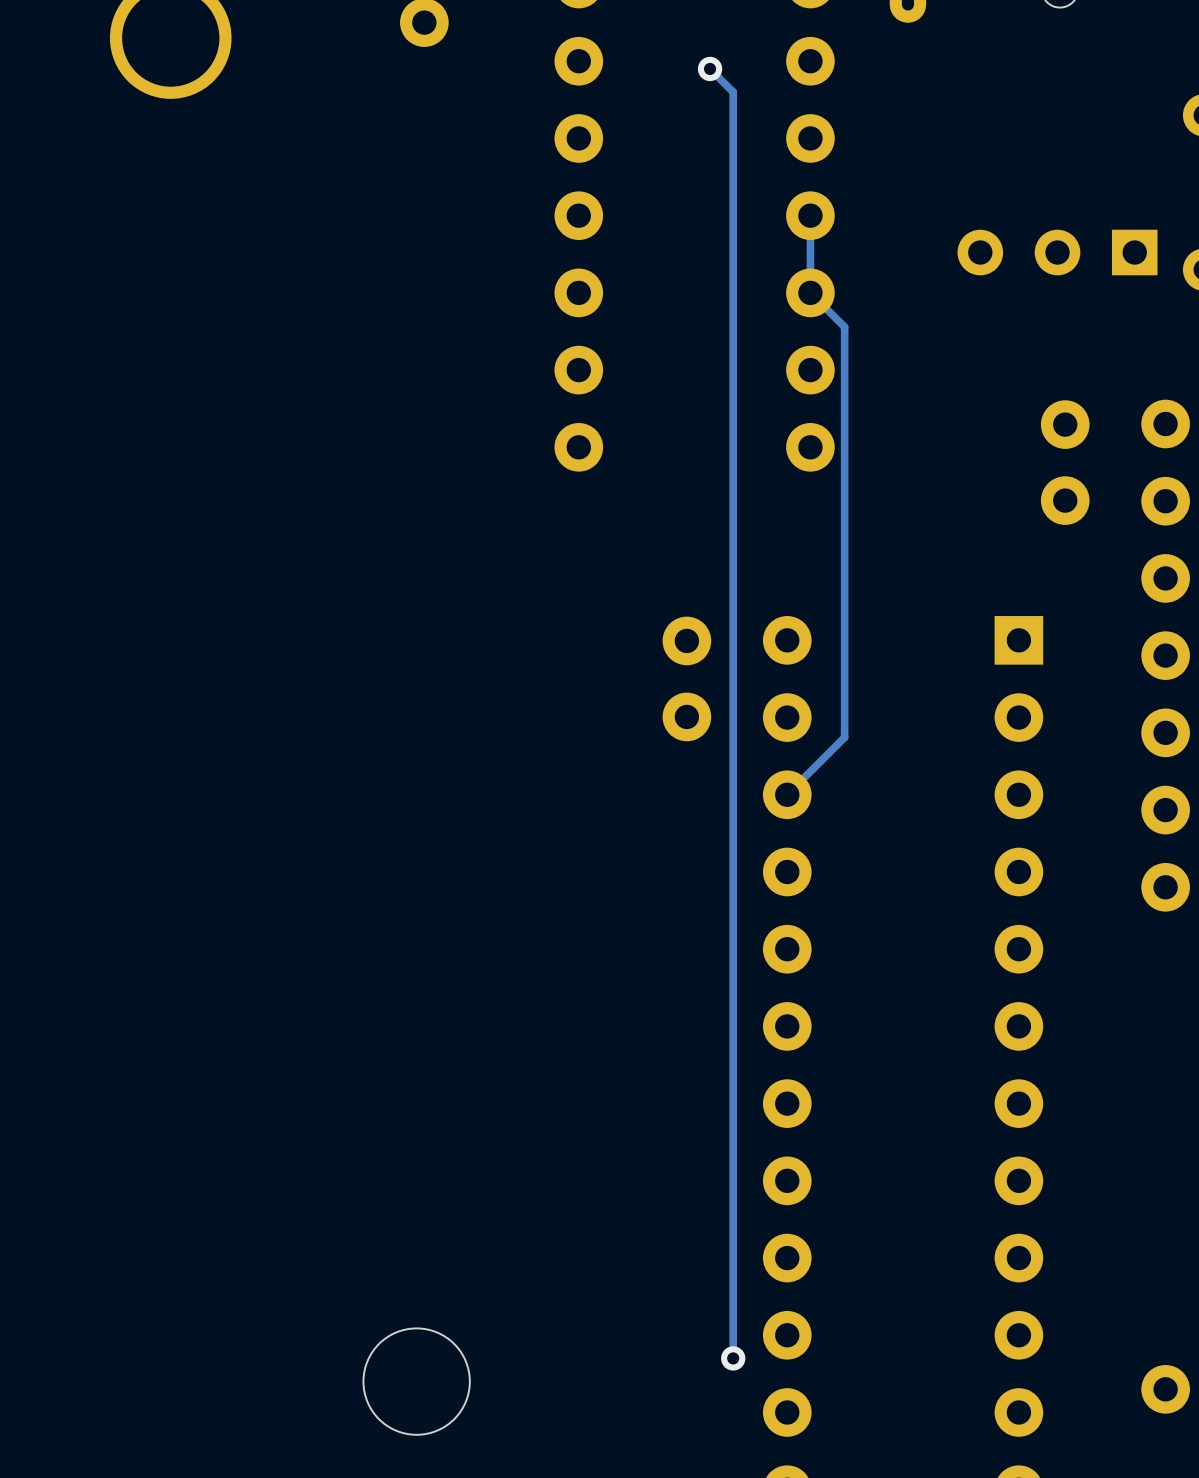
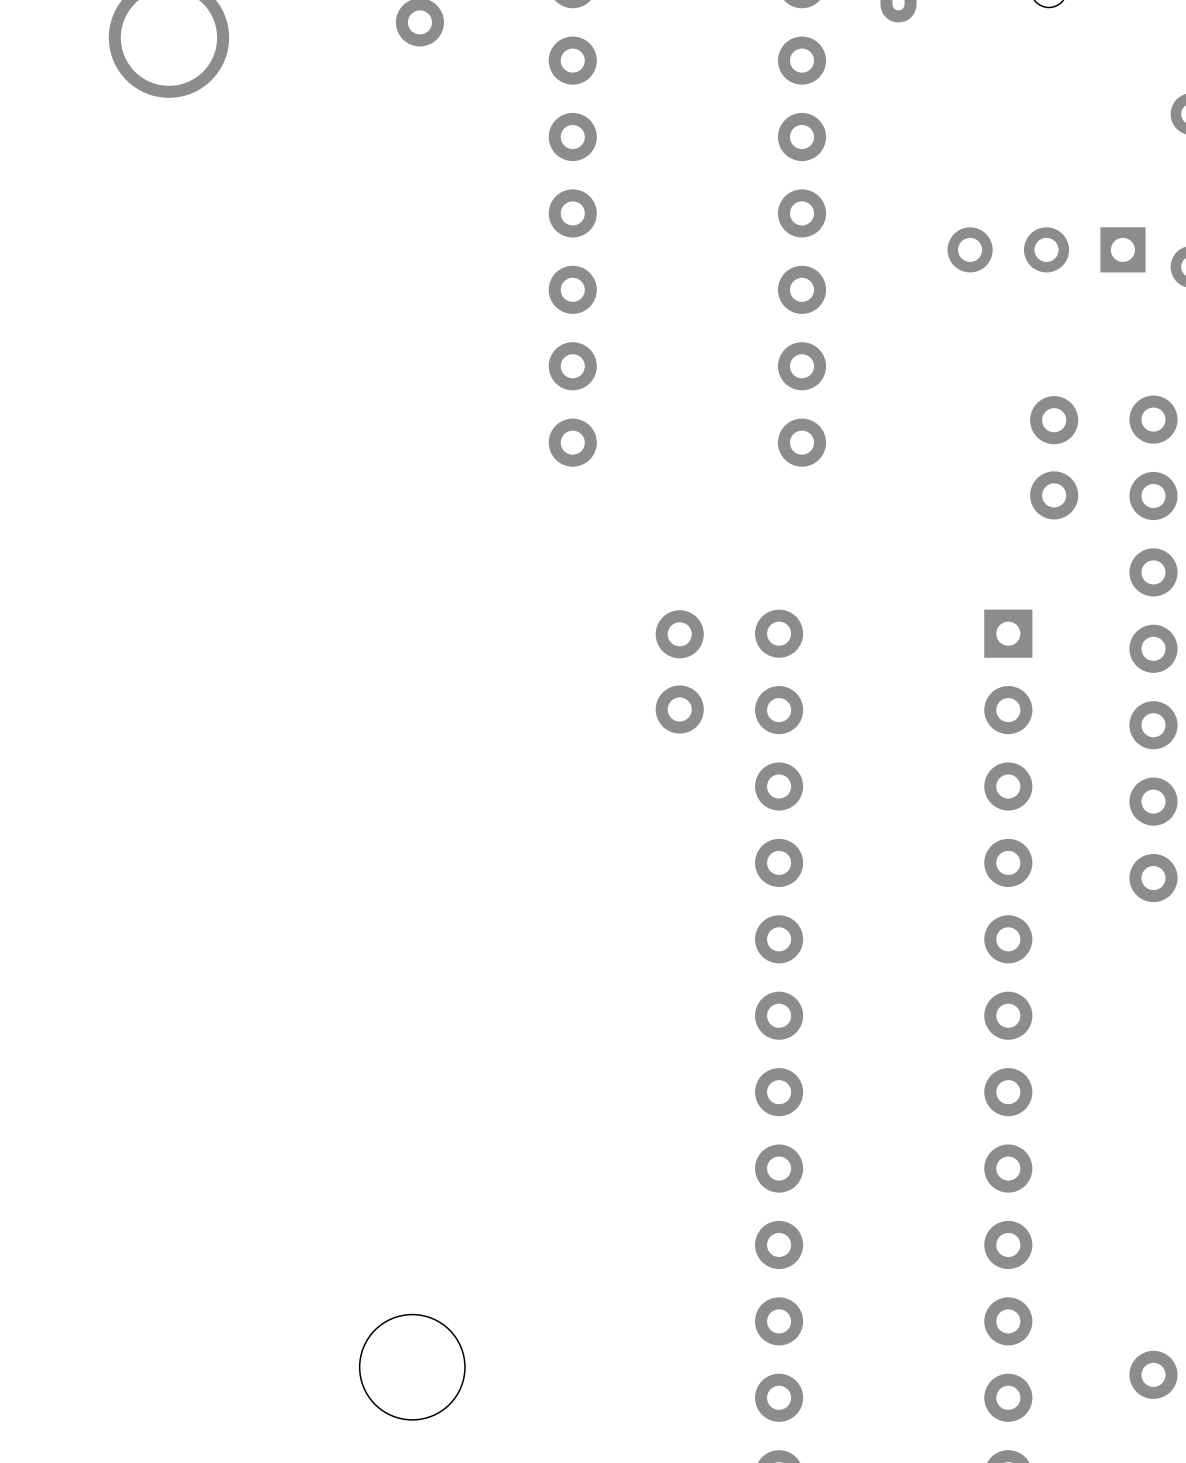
track: (710, 68) (733, 92) (733, 1358) -> none
via: (710, 68) -> none
track: (810, 215) (810, 292) (844, 327) (844, 737) (787, 794) -> none
via: (733, 1358) -> none

